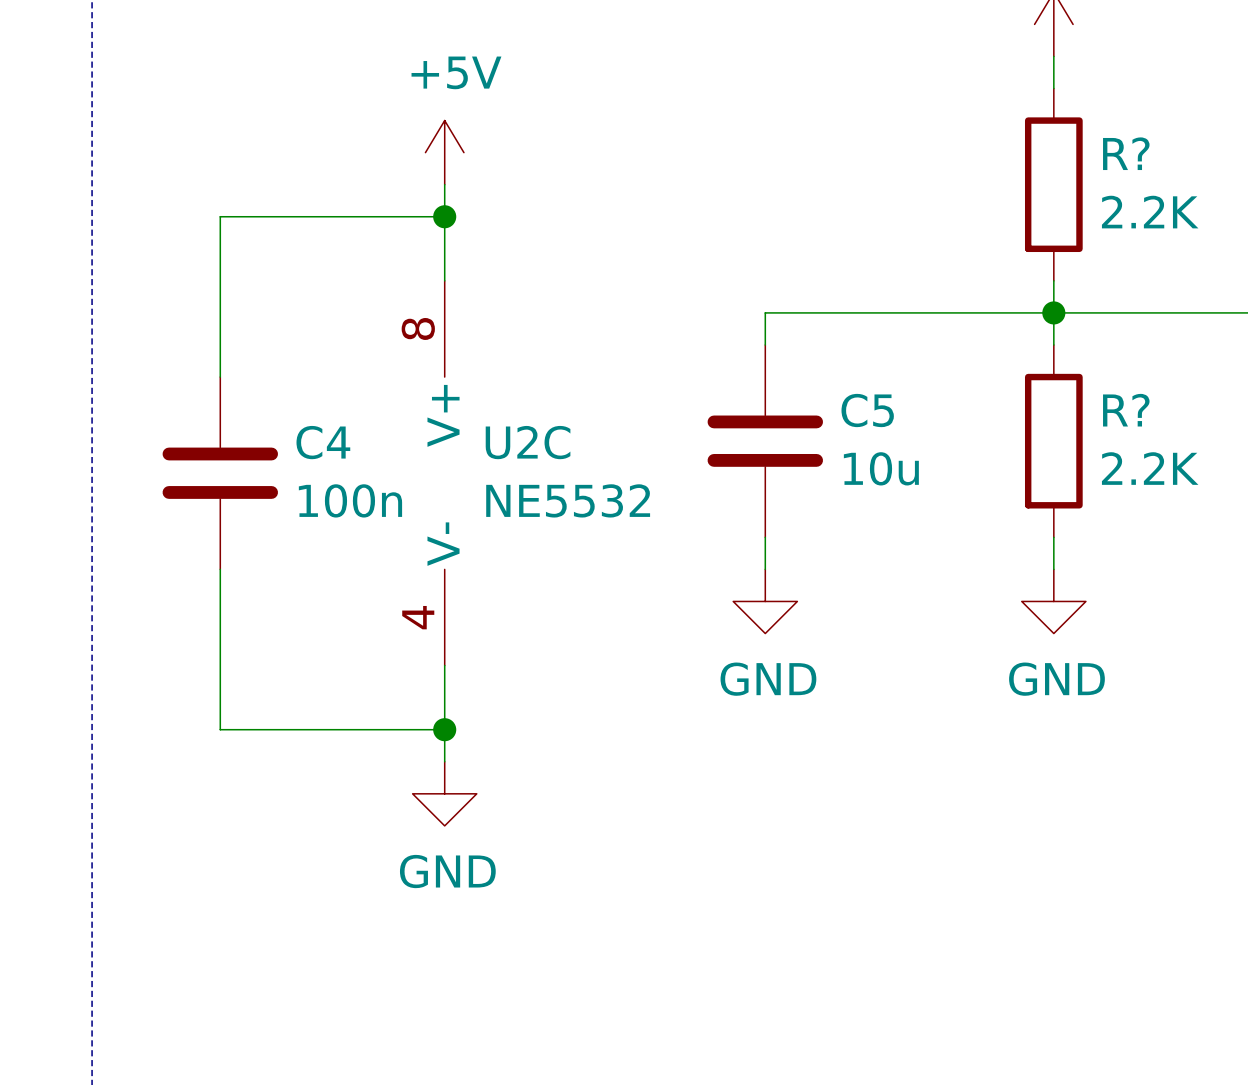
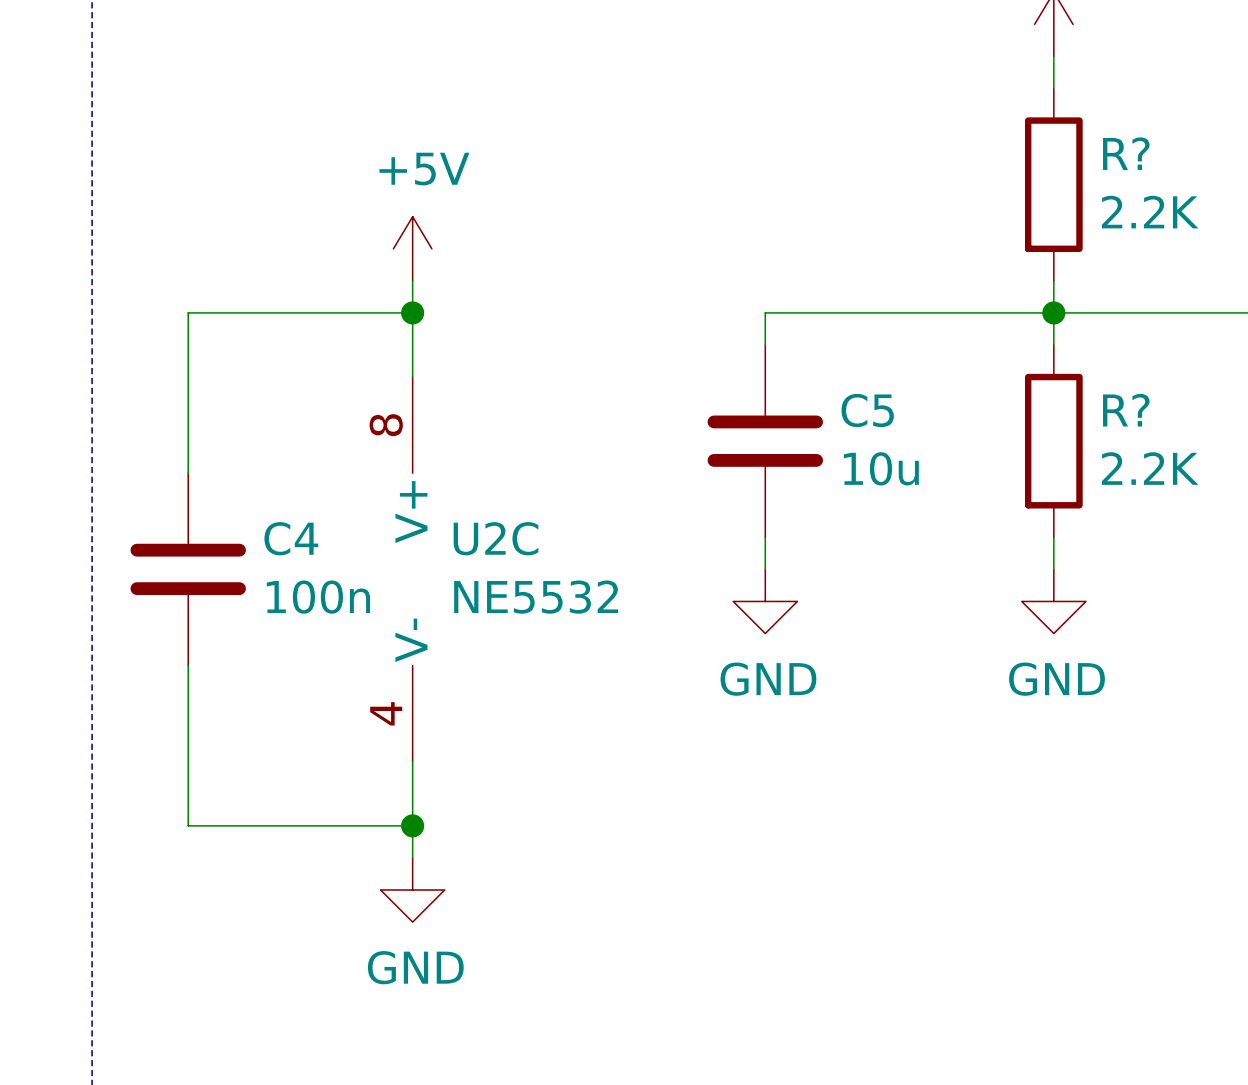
power symbol position: +5V (444, 152) -> +5V (412, 248)
wire: (444, 184) (444, 280) -> (412, 280) (412, 377)
wire: (444, 216) (220, 216) (220, 377) -> (412, 312) (188, 312) (188, 473)
junction position: (444, 216) -> (412, 312)
C4 position: (220, 473) -> (188, 569)
U2C position: (444, 473) -> (412, 569)
wire: (220, 569) (220, 729) (444, 729) -> (188, 665) (188, 825) (412, 825)
wire: (444, 665) (444, 761) -> (412, 761) (412, 857)
junction position: (444, 729) -> (412, 825)
power symbol position: GND (444, 793) -> GND (412, 890)

